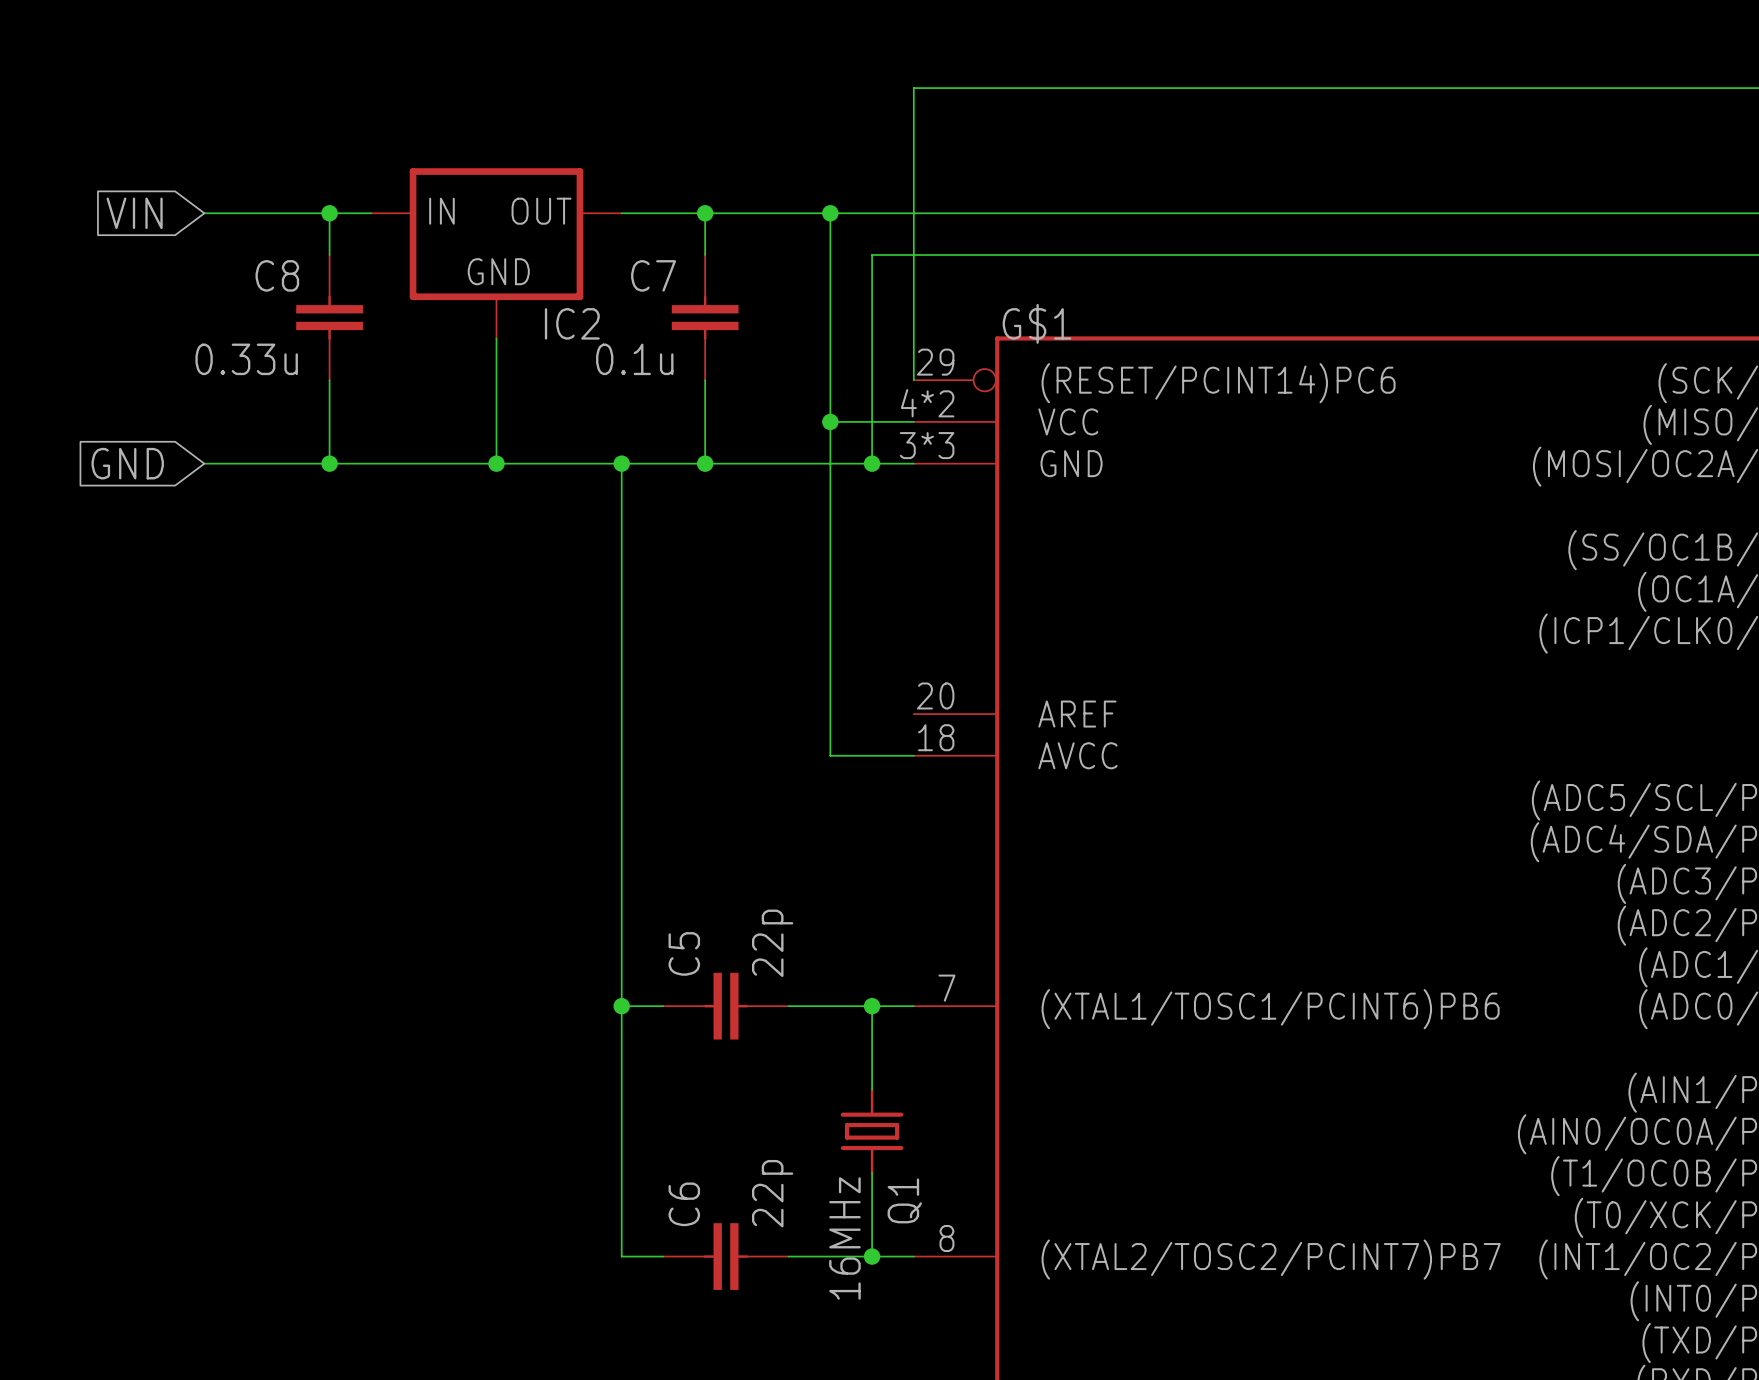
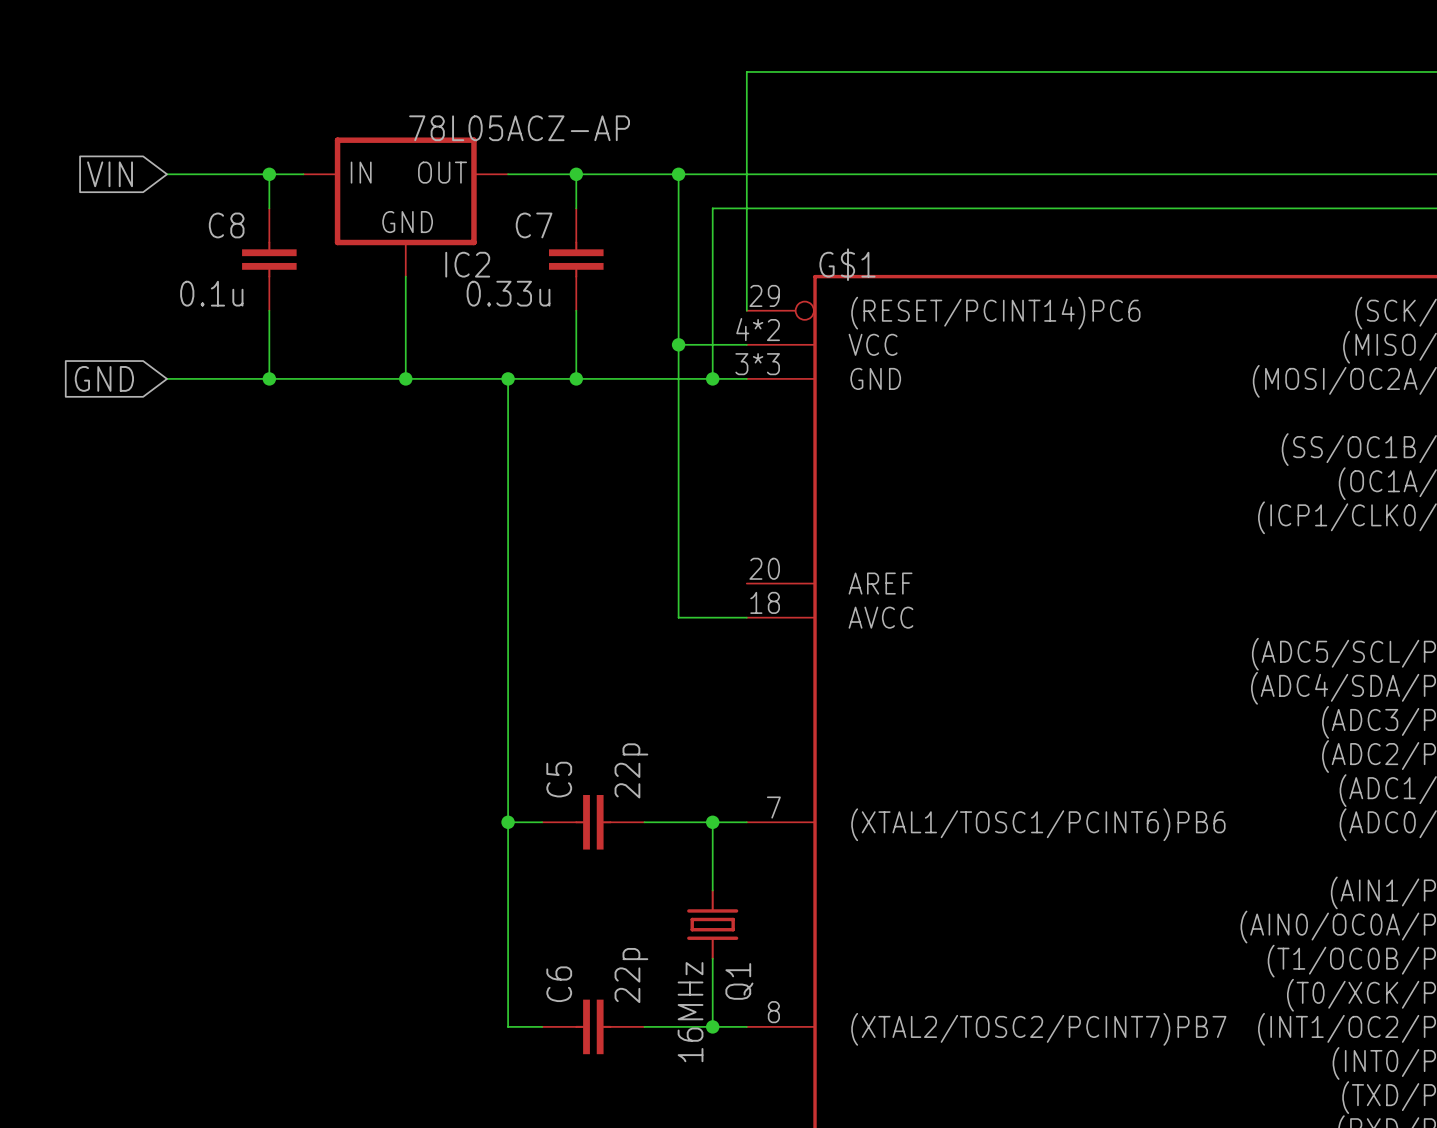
IC2 value: none -> 78L05ACZ-AP (519, 128)
C8 value: 0.33u (246, 359) -> 0.1u (211, 293)
C7 value: 0.1u (634, 359) -> 0.33u (508, 293)

